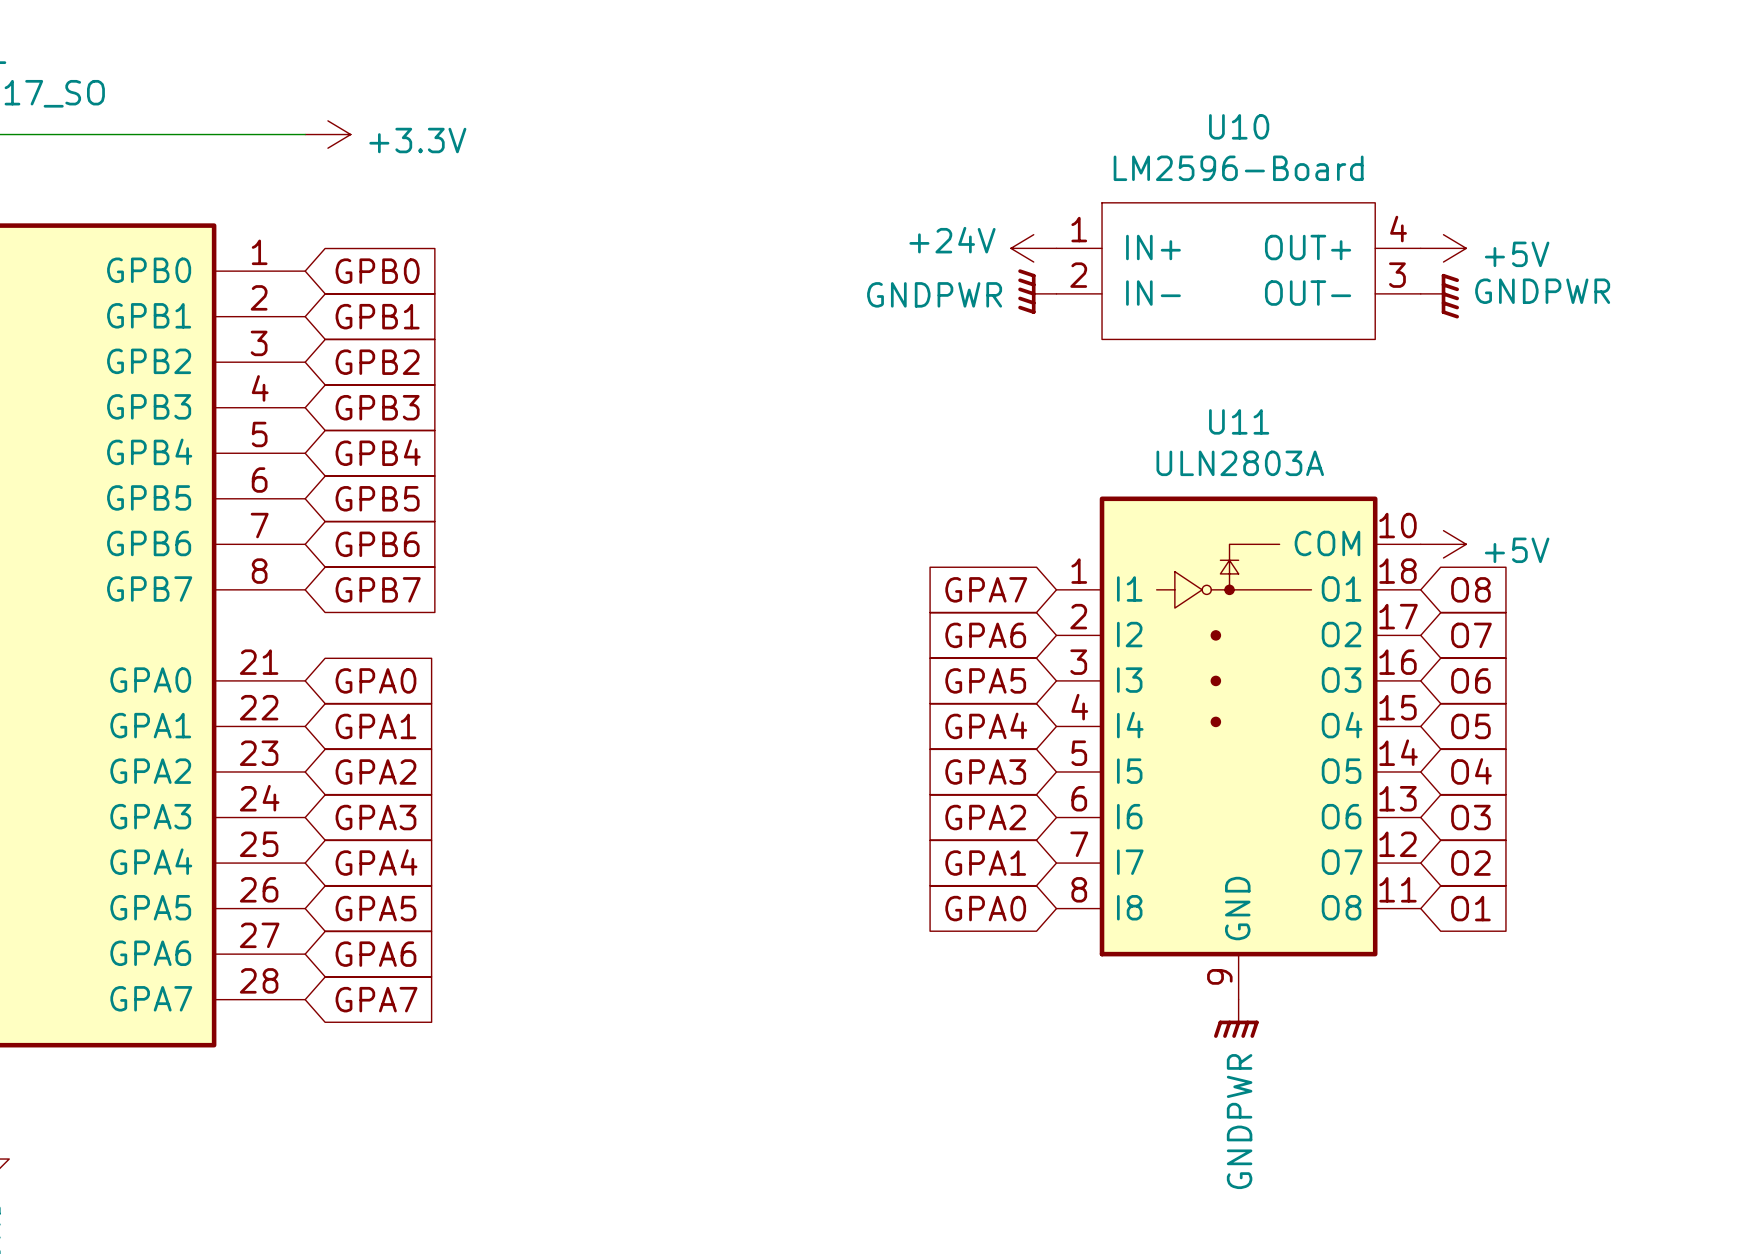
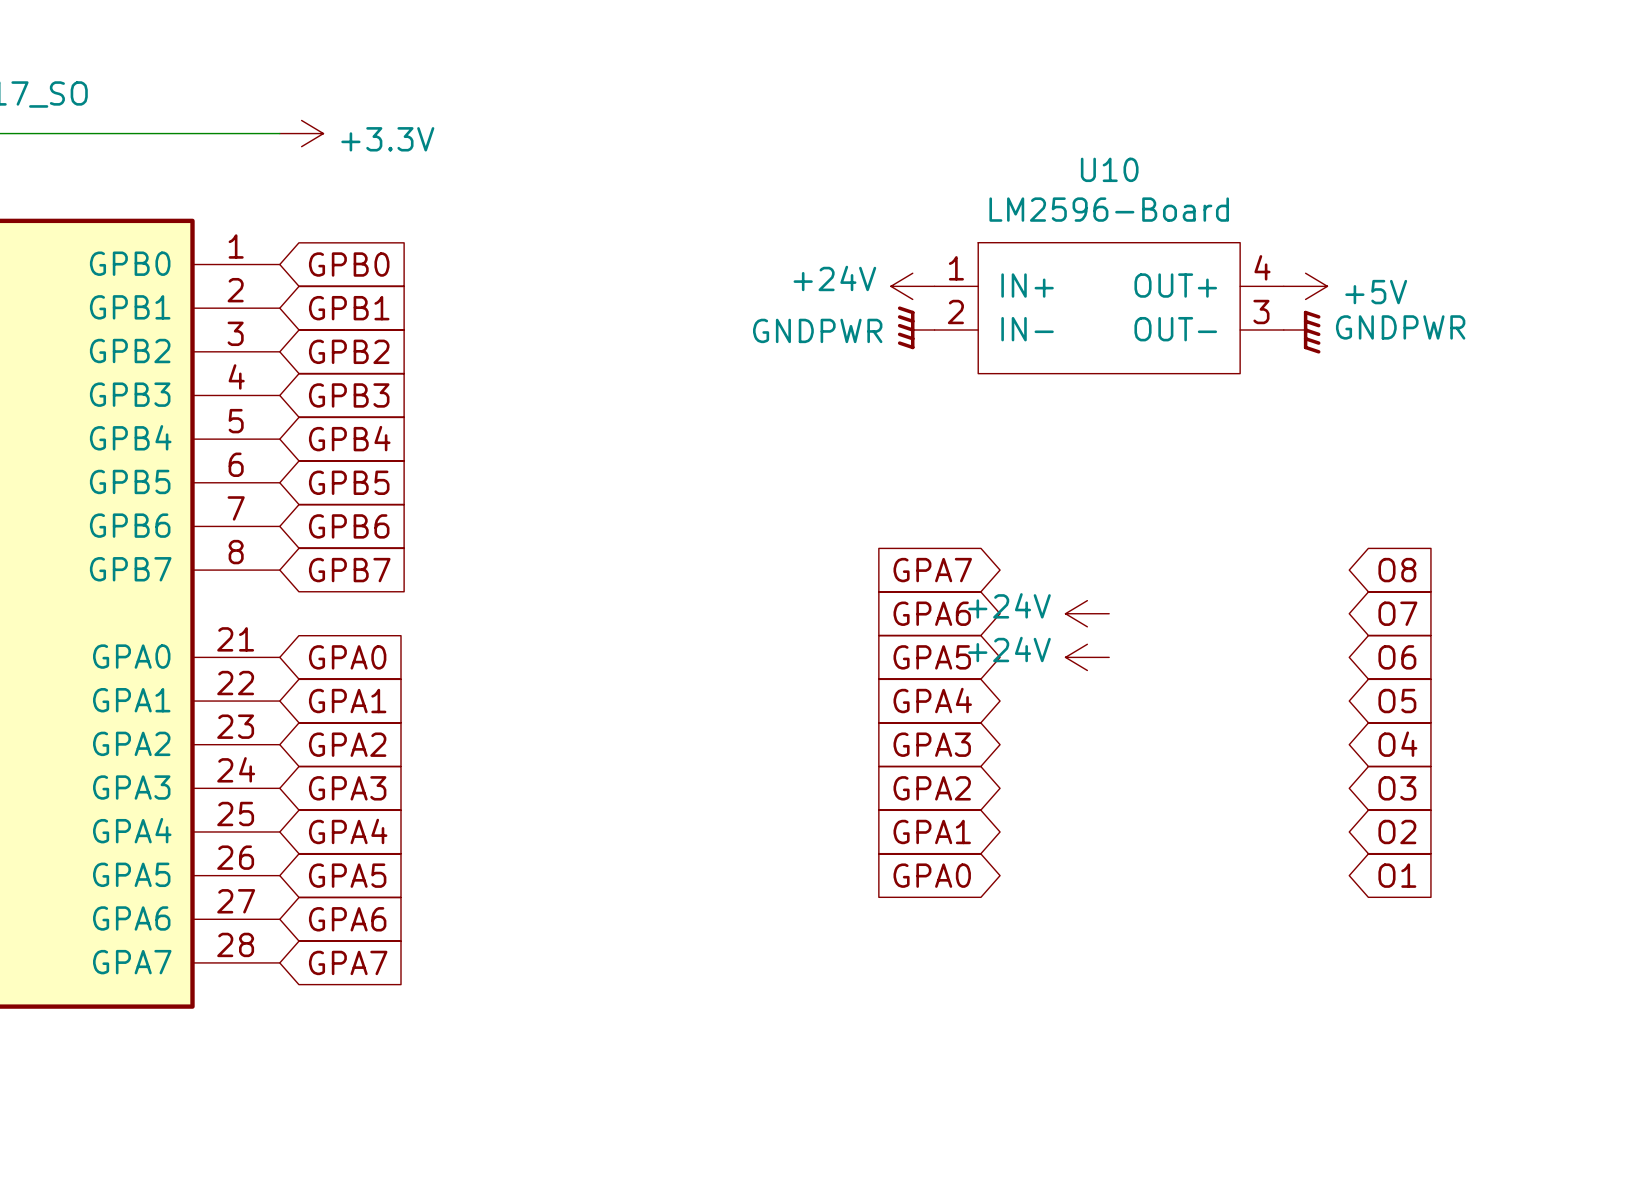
power symbol position: +24V (1033, 248) -> +24V (912, 286)
power symbol position: +5V (1443, 248) -> +5V (1305, 286)
U10 position: (1238, 271) -> (1109, 308)
power symbol position: GNDPWR (1037, 291) -> GNDPWR (916, 327)
power symbol position: GNDPWR (1439, 296) -> GNDPWR (1302, 332)
power symbol: +5V (1443, 544) -> none
power symbol: none -> +24V (1087, 613)
power symbol: none -> +24V (1087, 657)
U11: ULN2803A (1238, 748) -> none
power symbol: GNDPWR (1236, 1018) -> none

